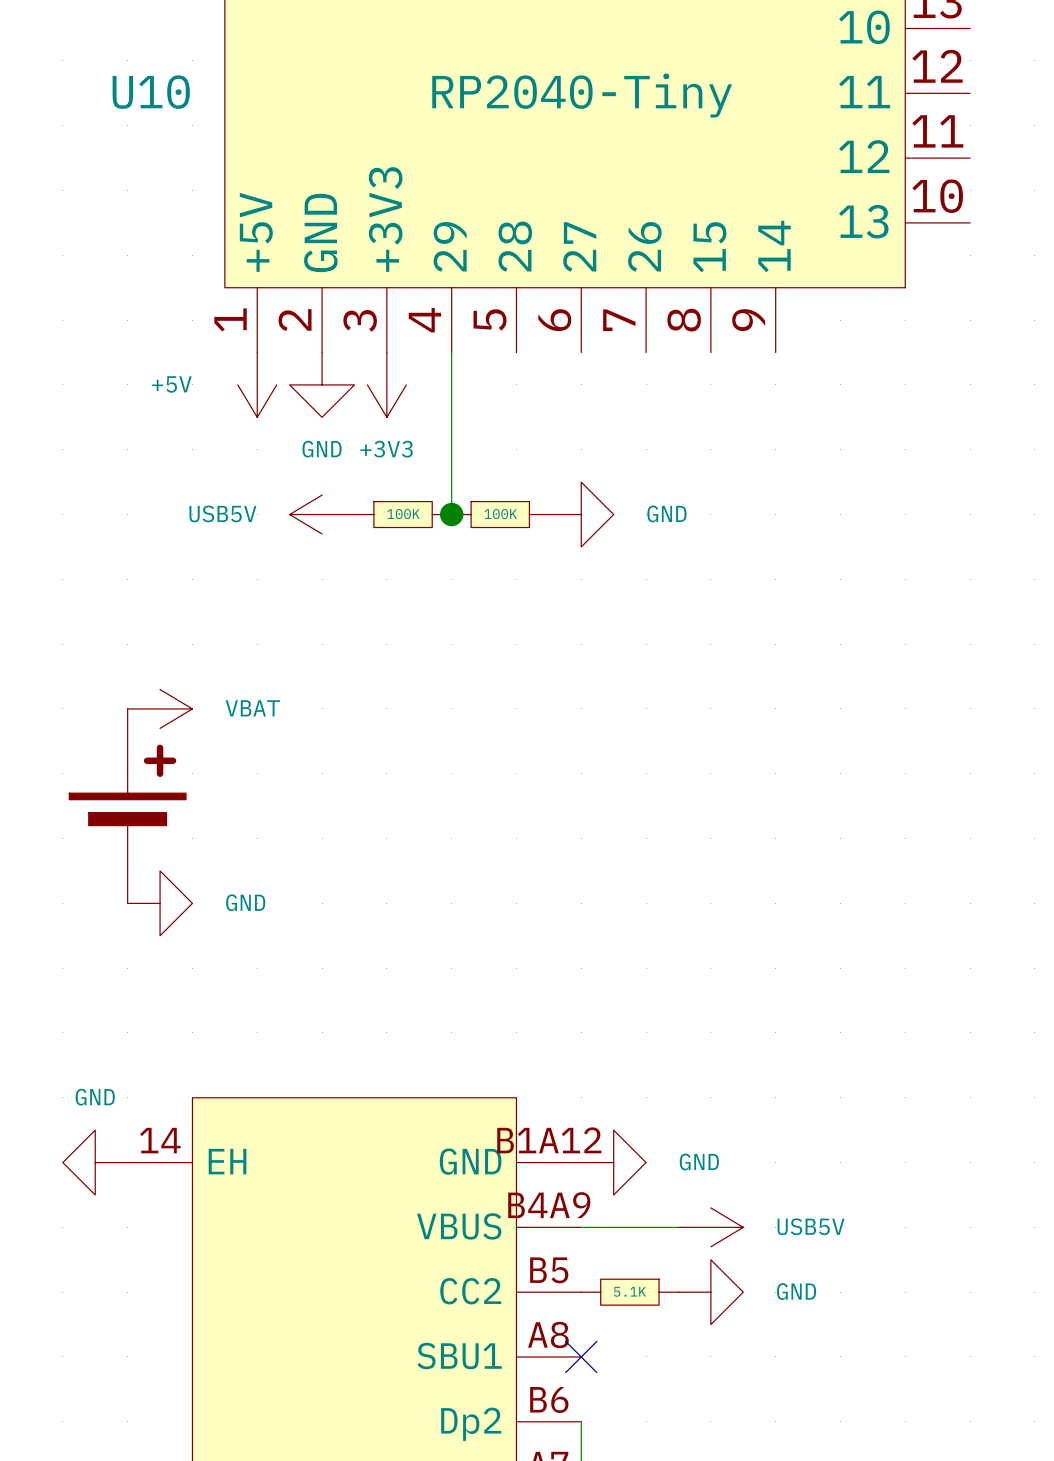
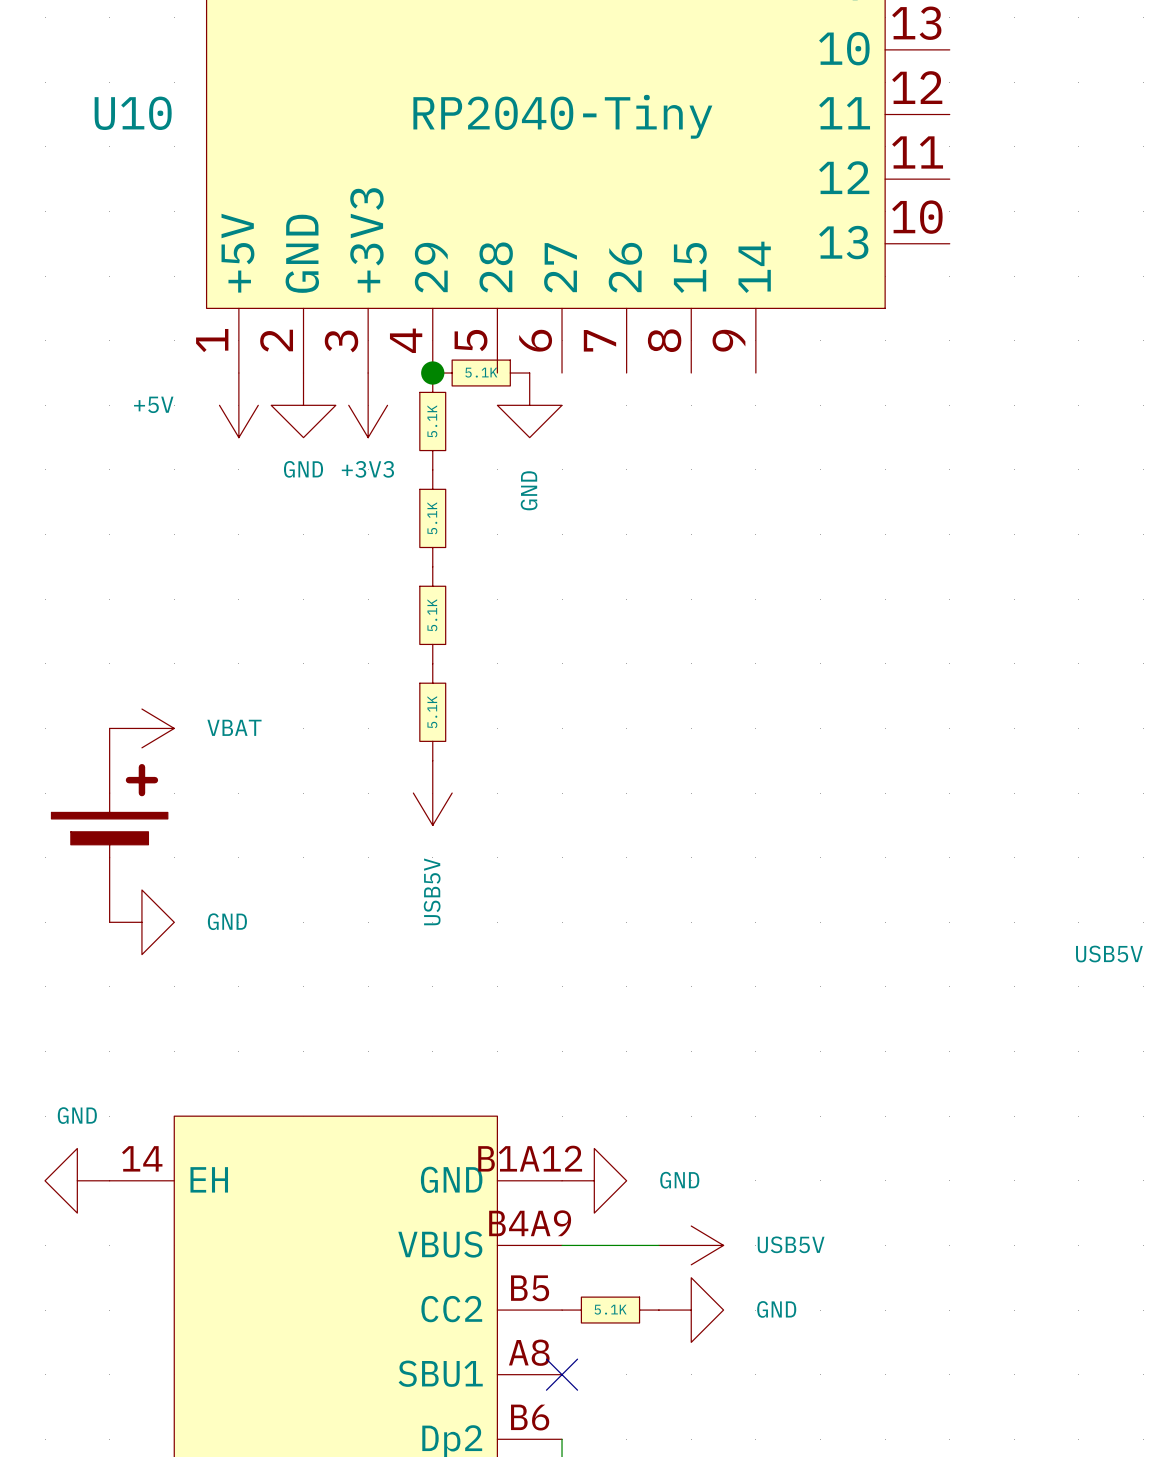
junction: none -> (432, 373)
part: none -> 5.1K (481, 373)
part: none -> 5.1K (432, 421)
part: none -> 5.1K (432, 518)
power symbol rotation: 0° (322, 514) -> 90° counterclockwise (432, 793)
power symbol position: USB5V (322, 514) -> USB5V (432, 793)
part: 100K (403, 514) -> none
junction: (451, 514) -> none
part: 100K (500, 514) -> none
power symbol rotation: 0° (581, 514) -> 90° clockwise (529, 405)
power symbol position: GND (581, 514) -> GND (529, 405)
part: none -> 5.1K (432, 615)
part: none -> 5.1K (432, 712)

